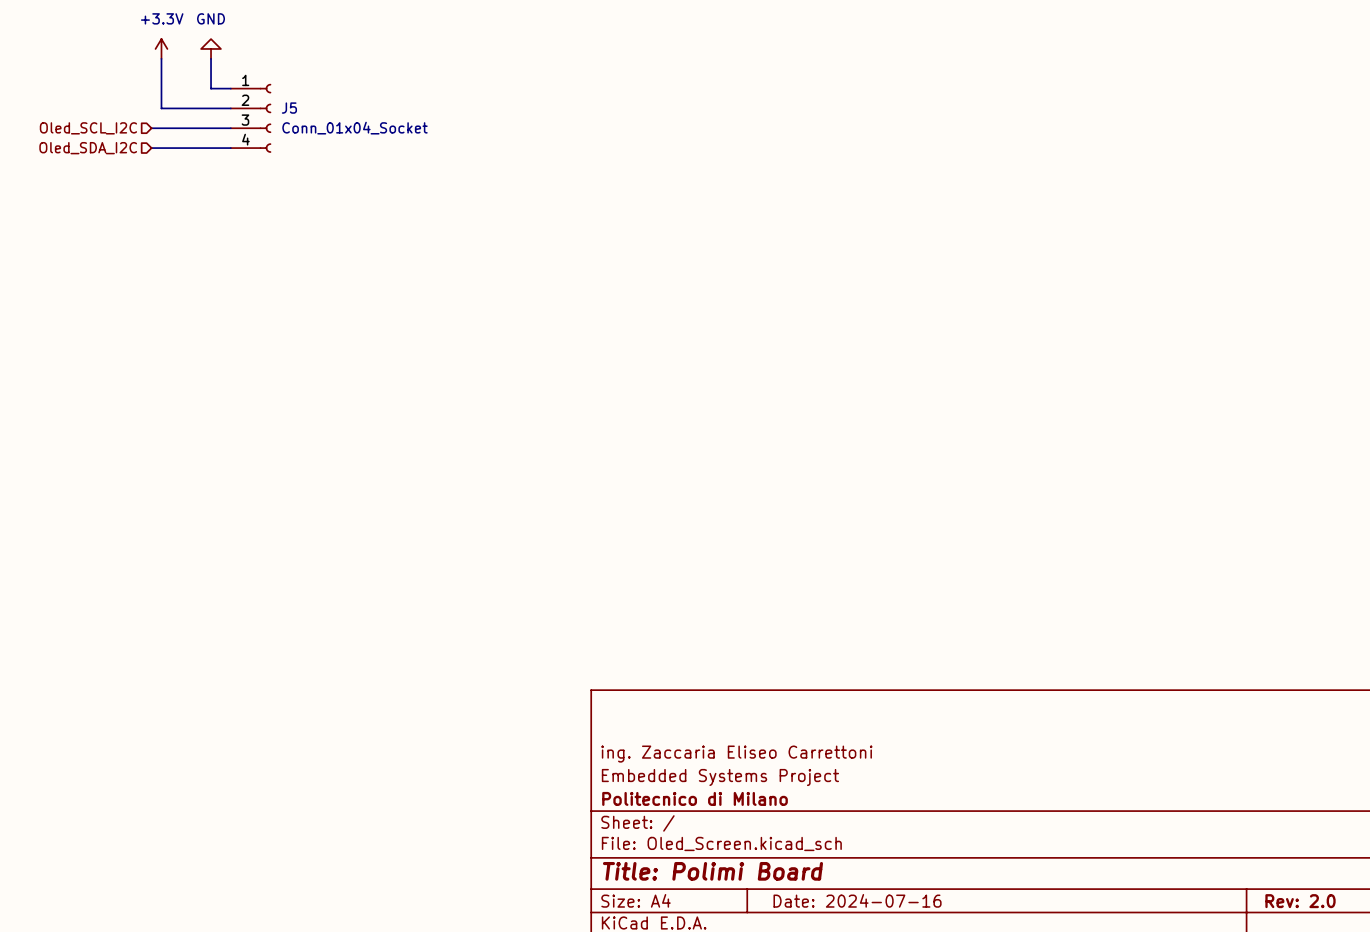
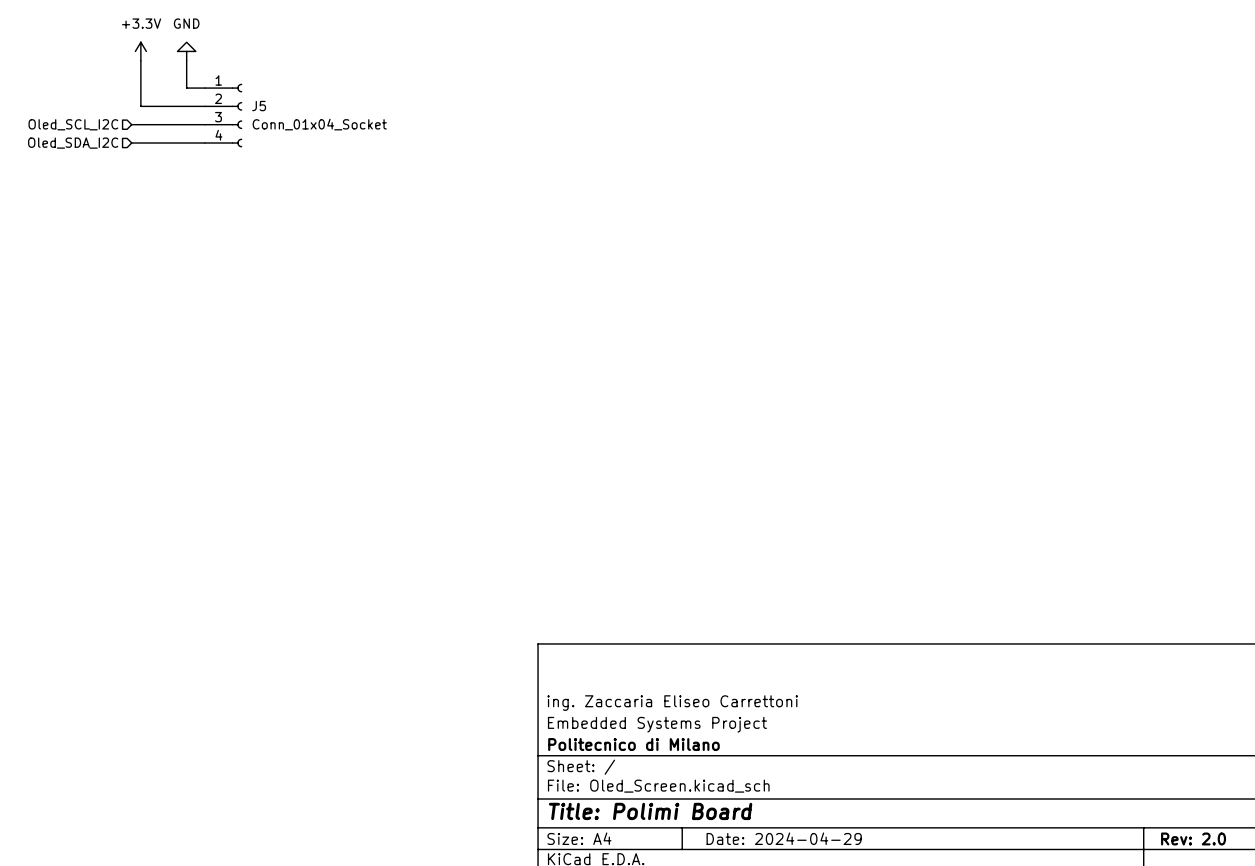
title block: Date: 2024-07-16 (857, 900) -> Date: 2024-04-29 (784, 838)

